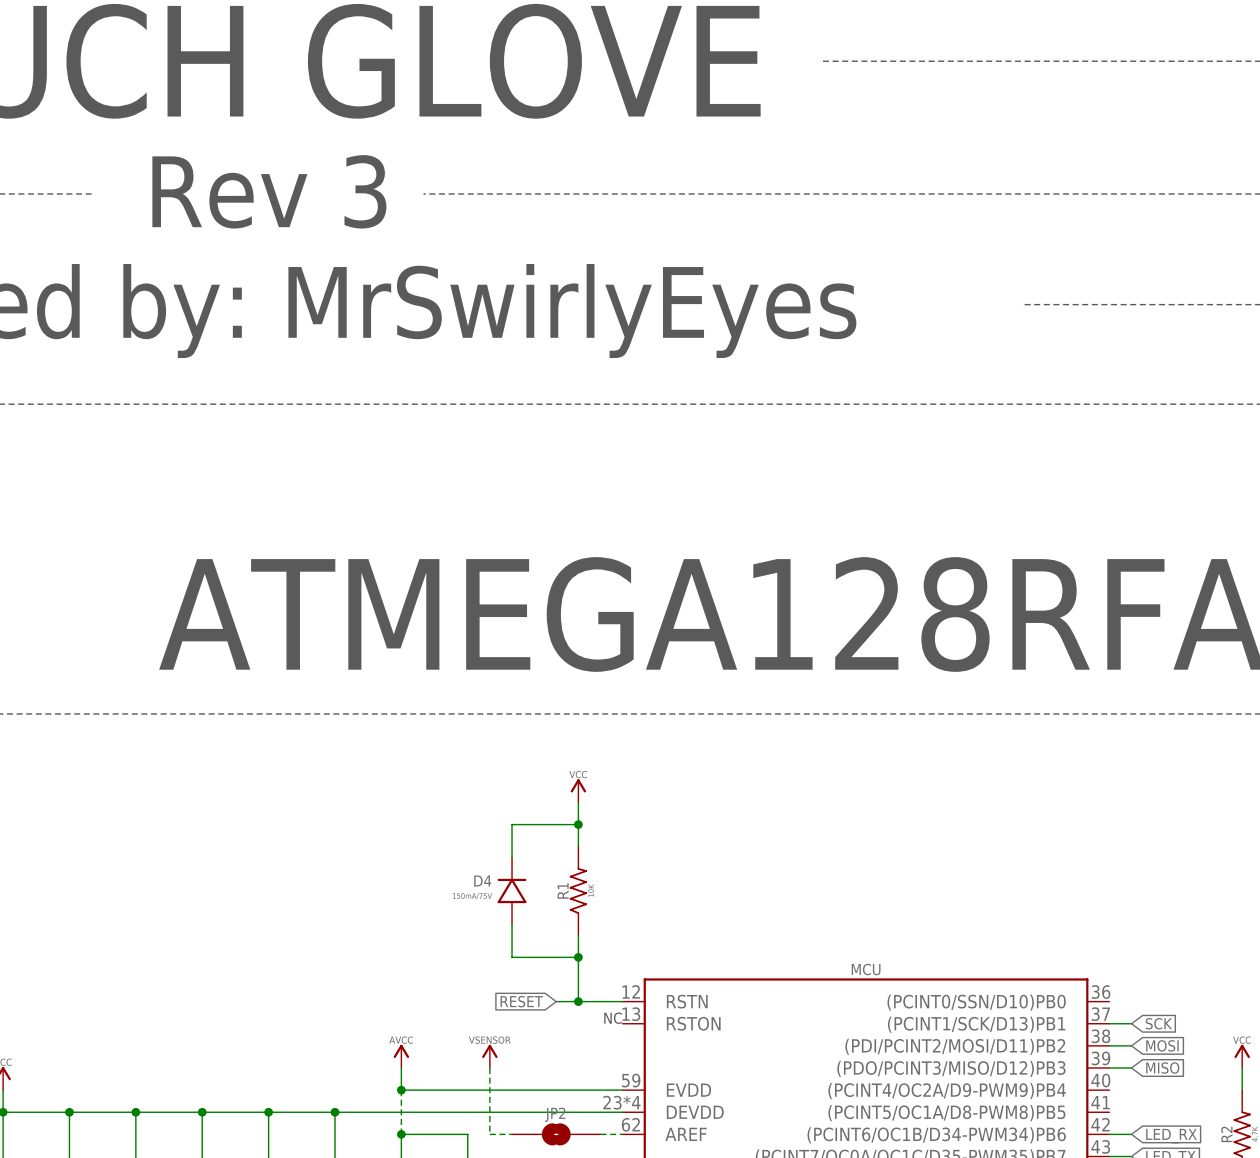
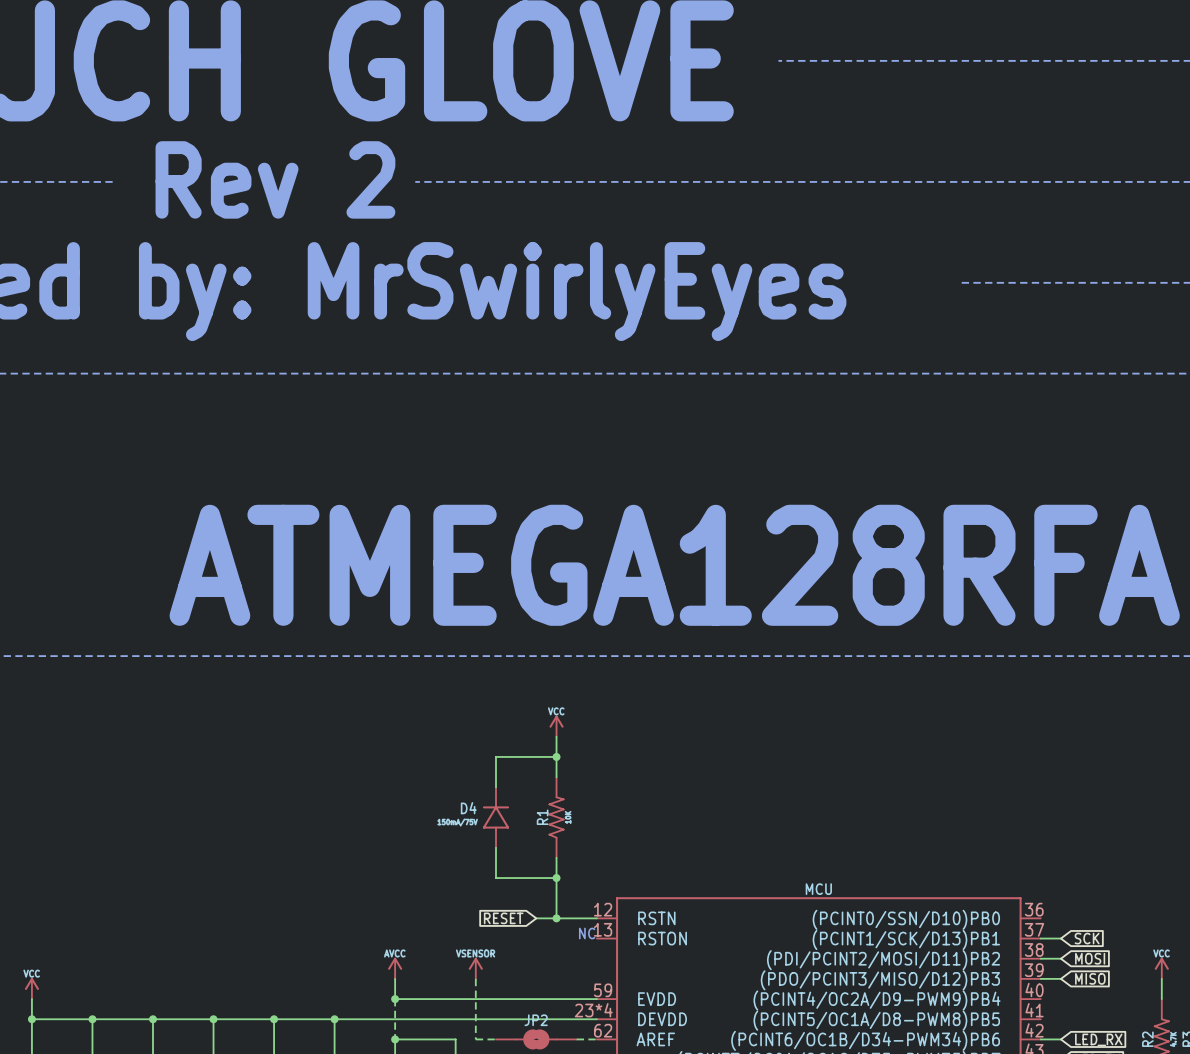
text: Rev 3 (269, 191) -> Rev 2 (275, 179)

